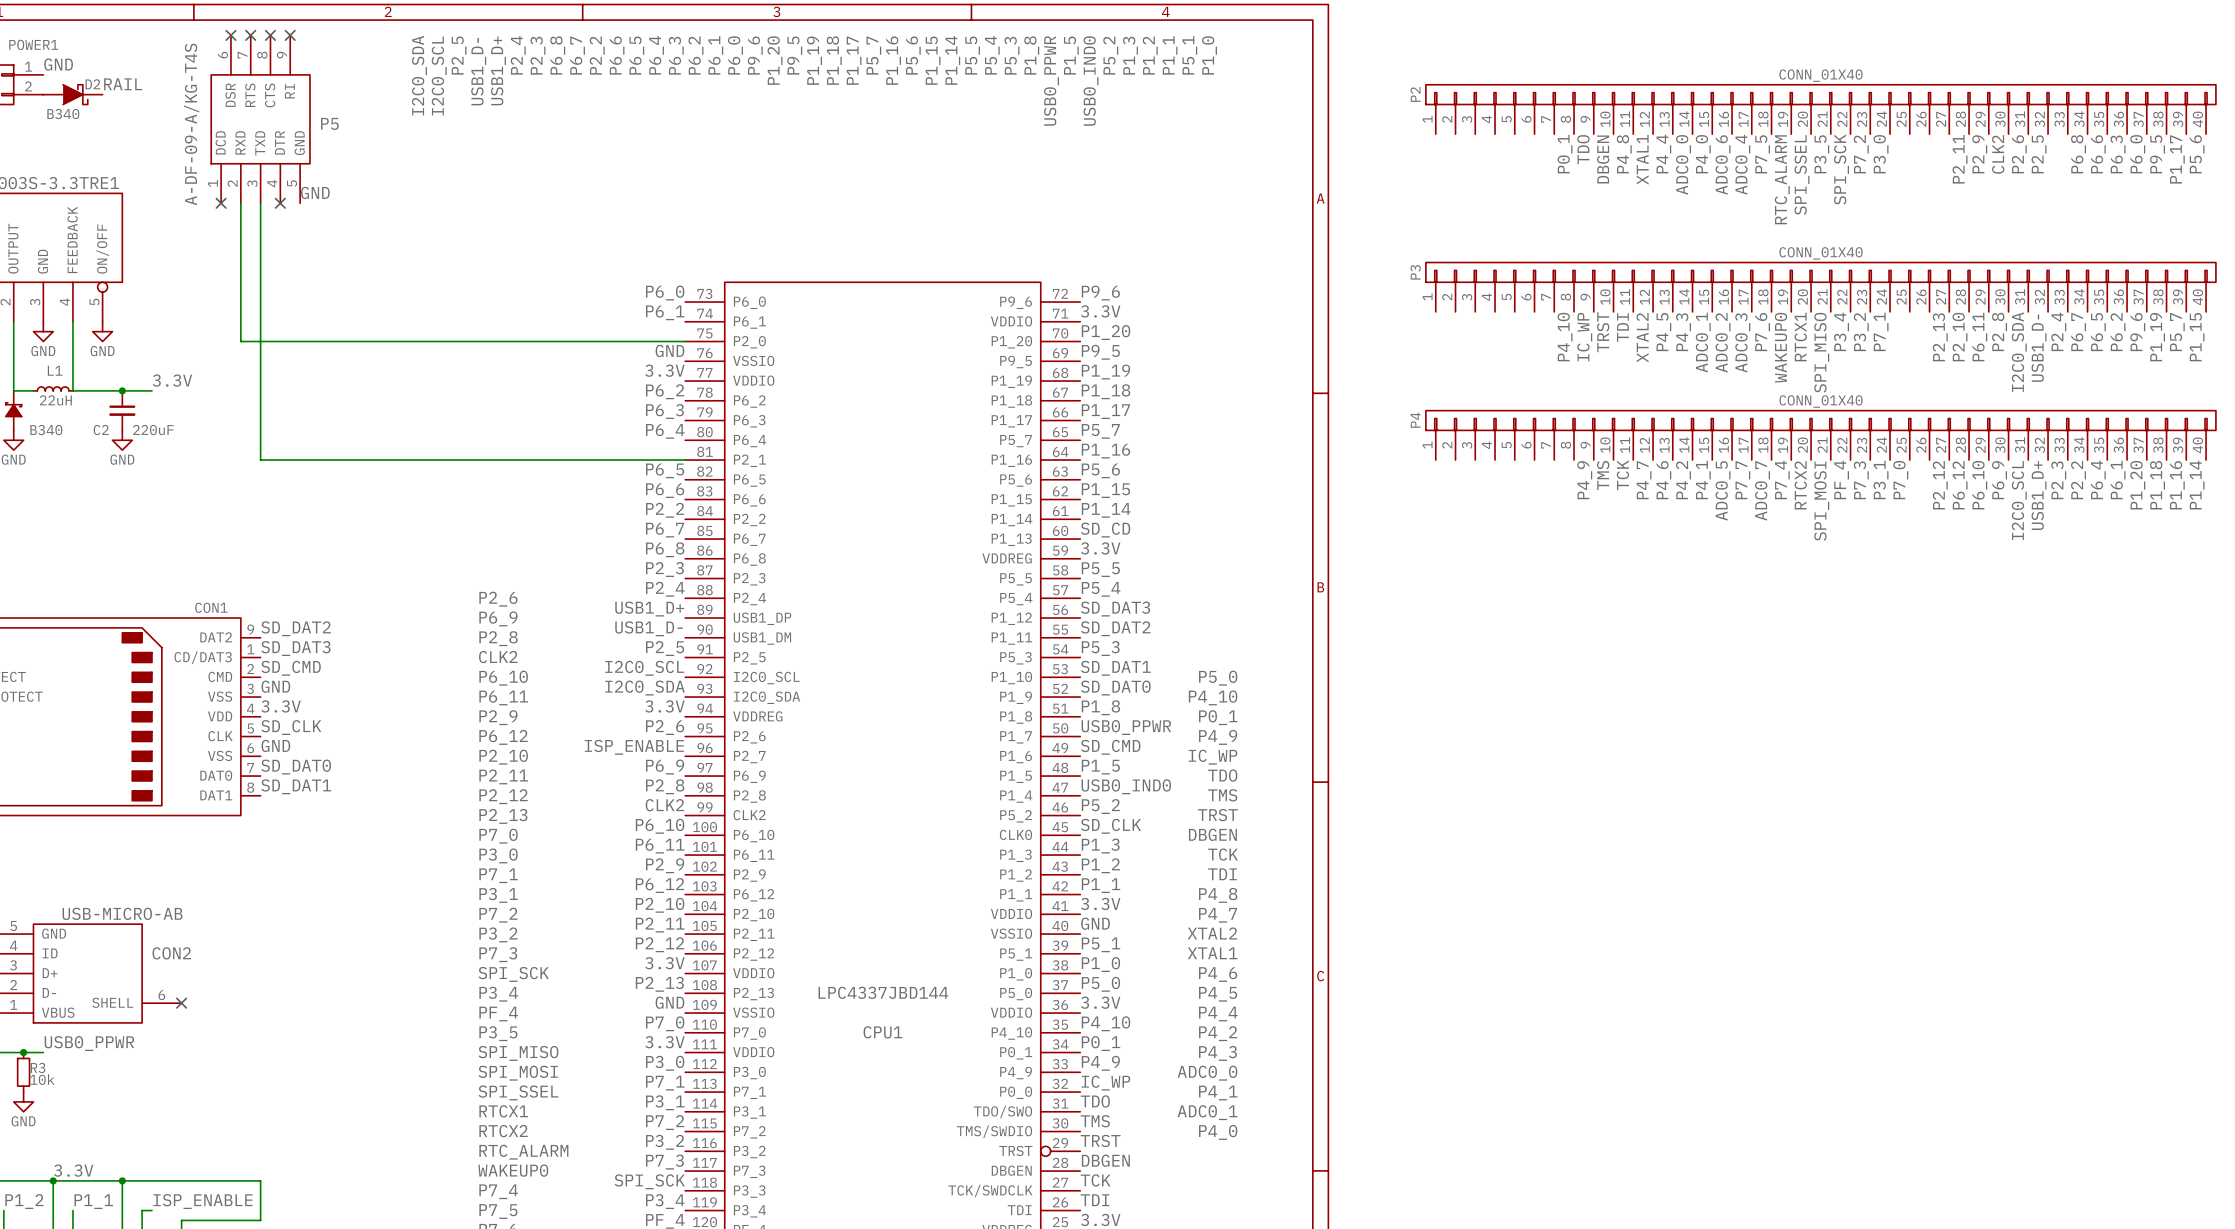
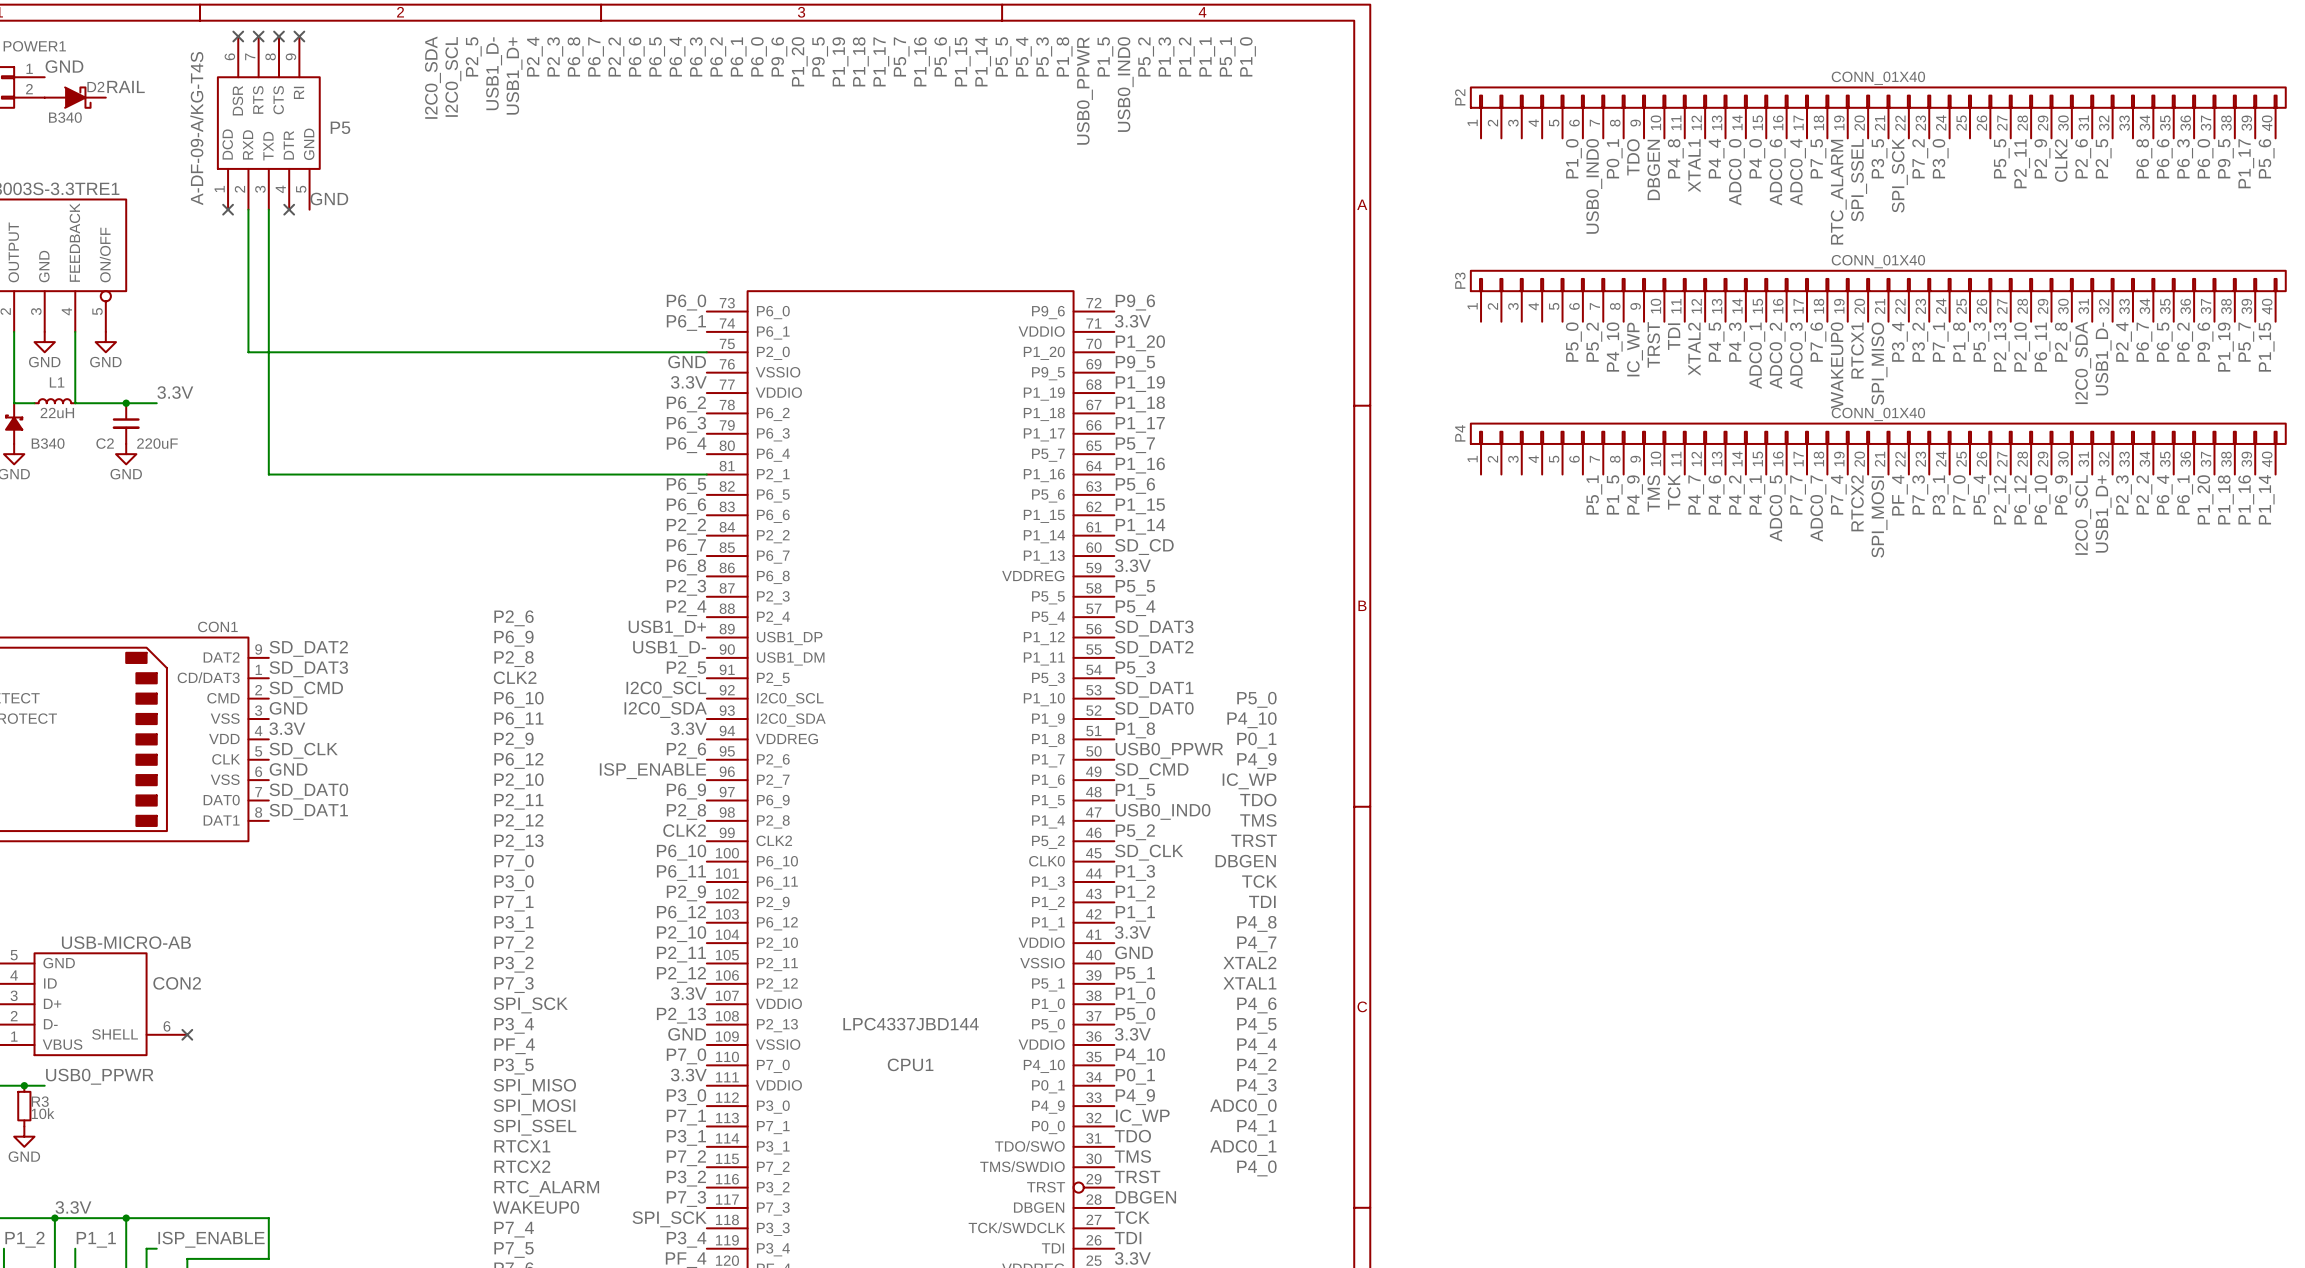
label: none -> P1_0 (1573, 158)
label: none -> P5_5 (2001, 158)
label: none -> USB0_IND0 (1594, 186)
label: none -> P5_0 (1573, 342)
label: none -> P1_8 (1961, 342)
label: none -> P5_2 (1594, 342)
label: none -> P5_3 (1981, 342)
label: none -> P5_4 (1981, 494)
label: none -> P5_1 (1594, 494)
label: none -> P1_5 (1614, 494)

